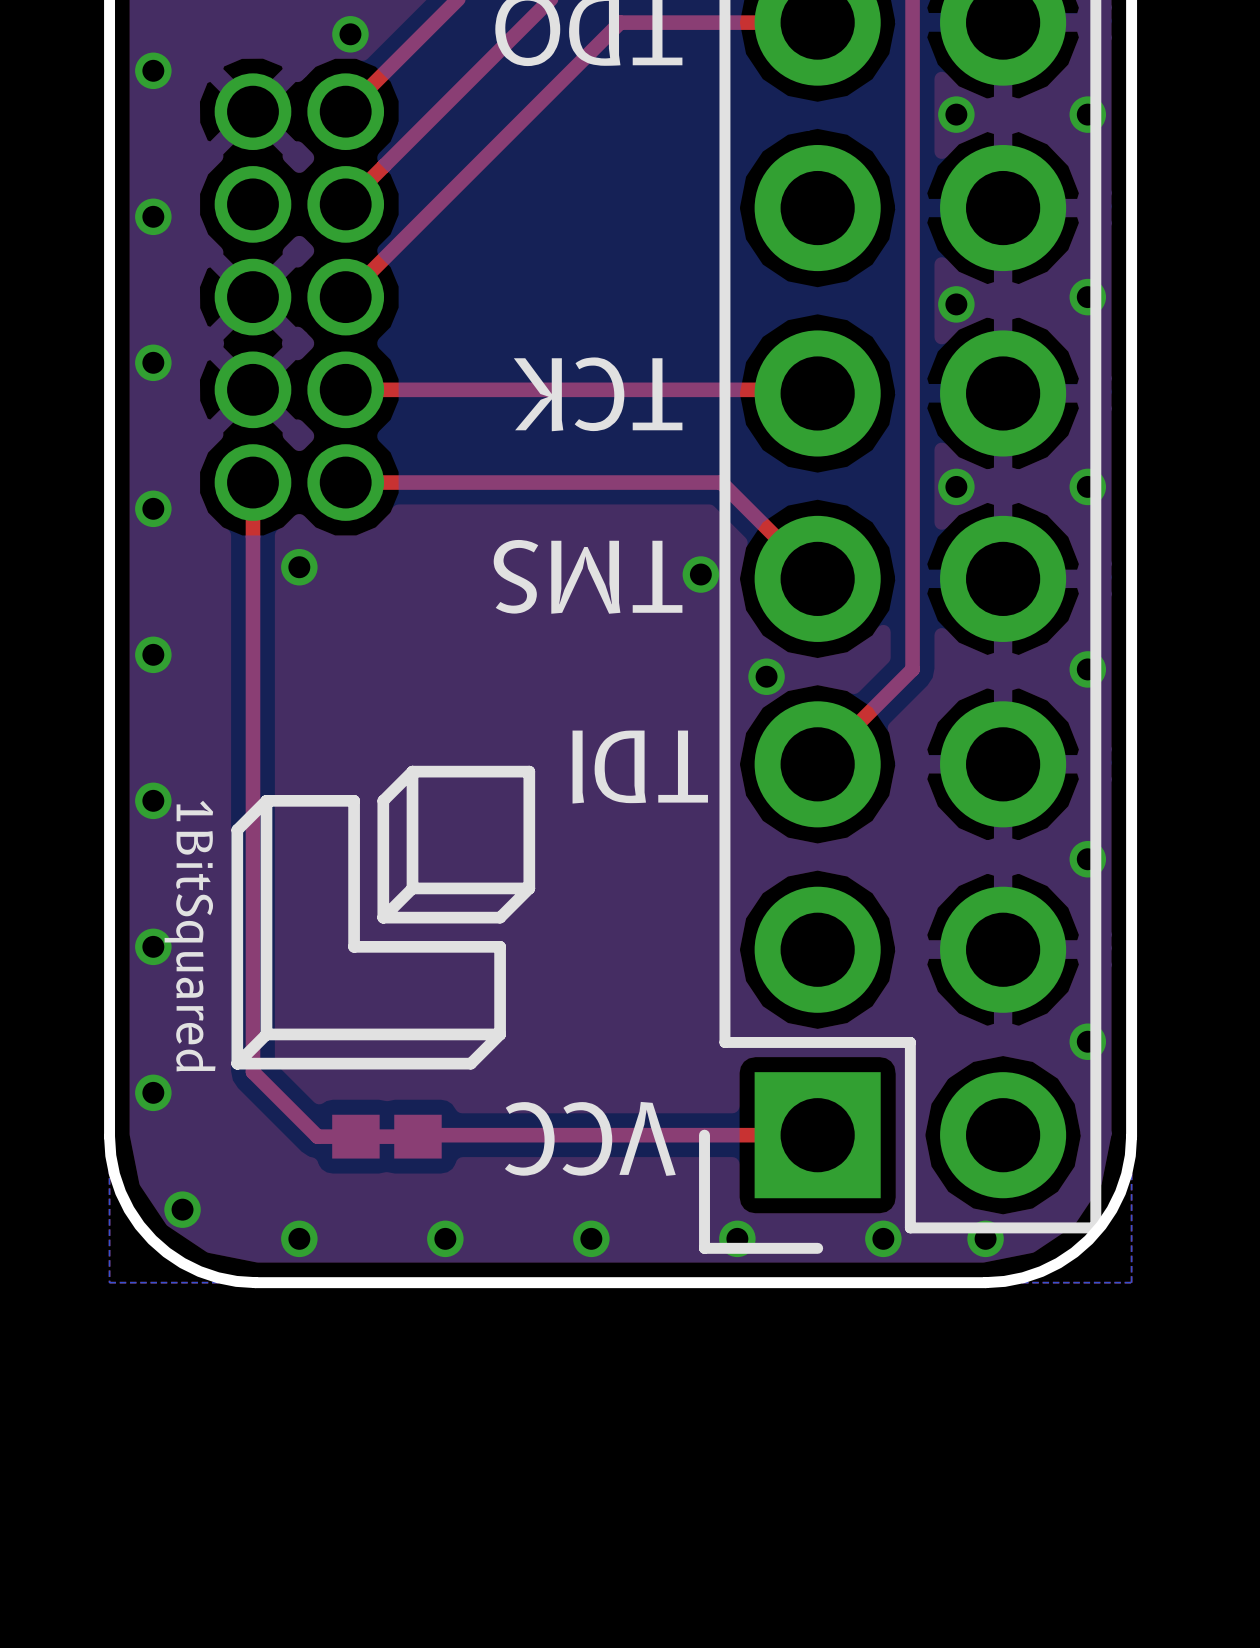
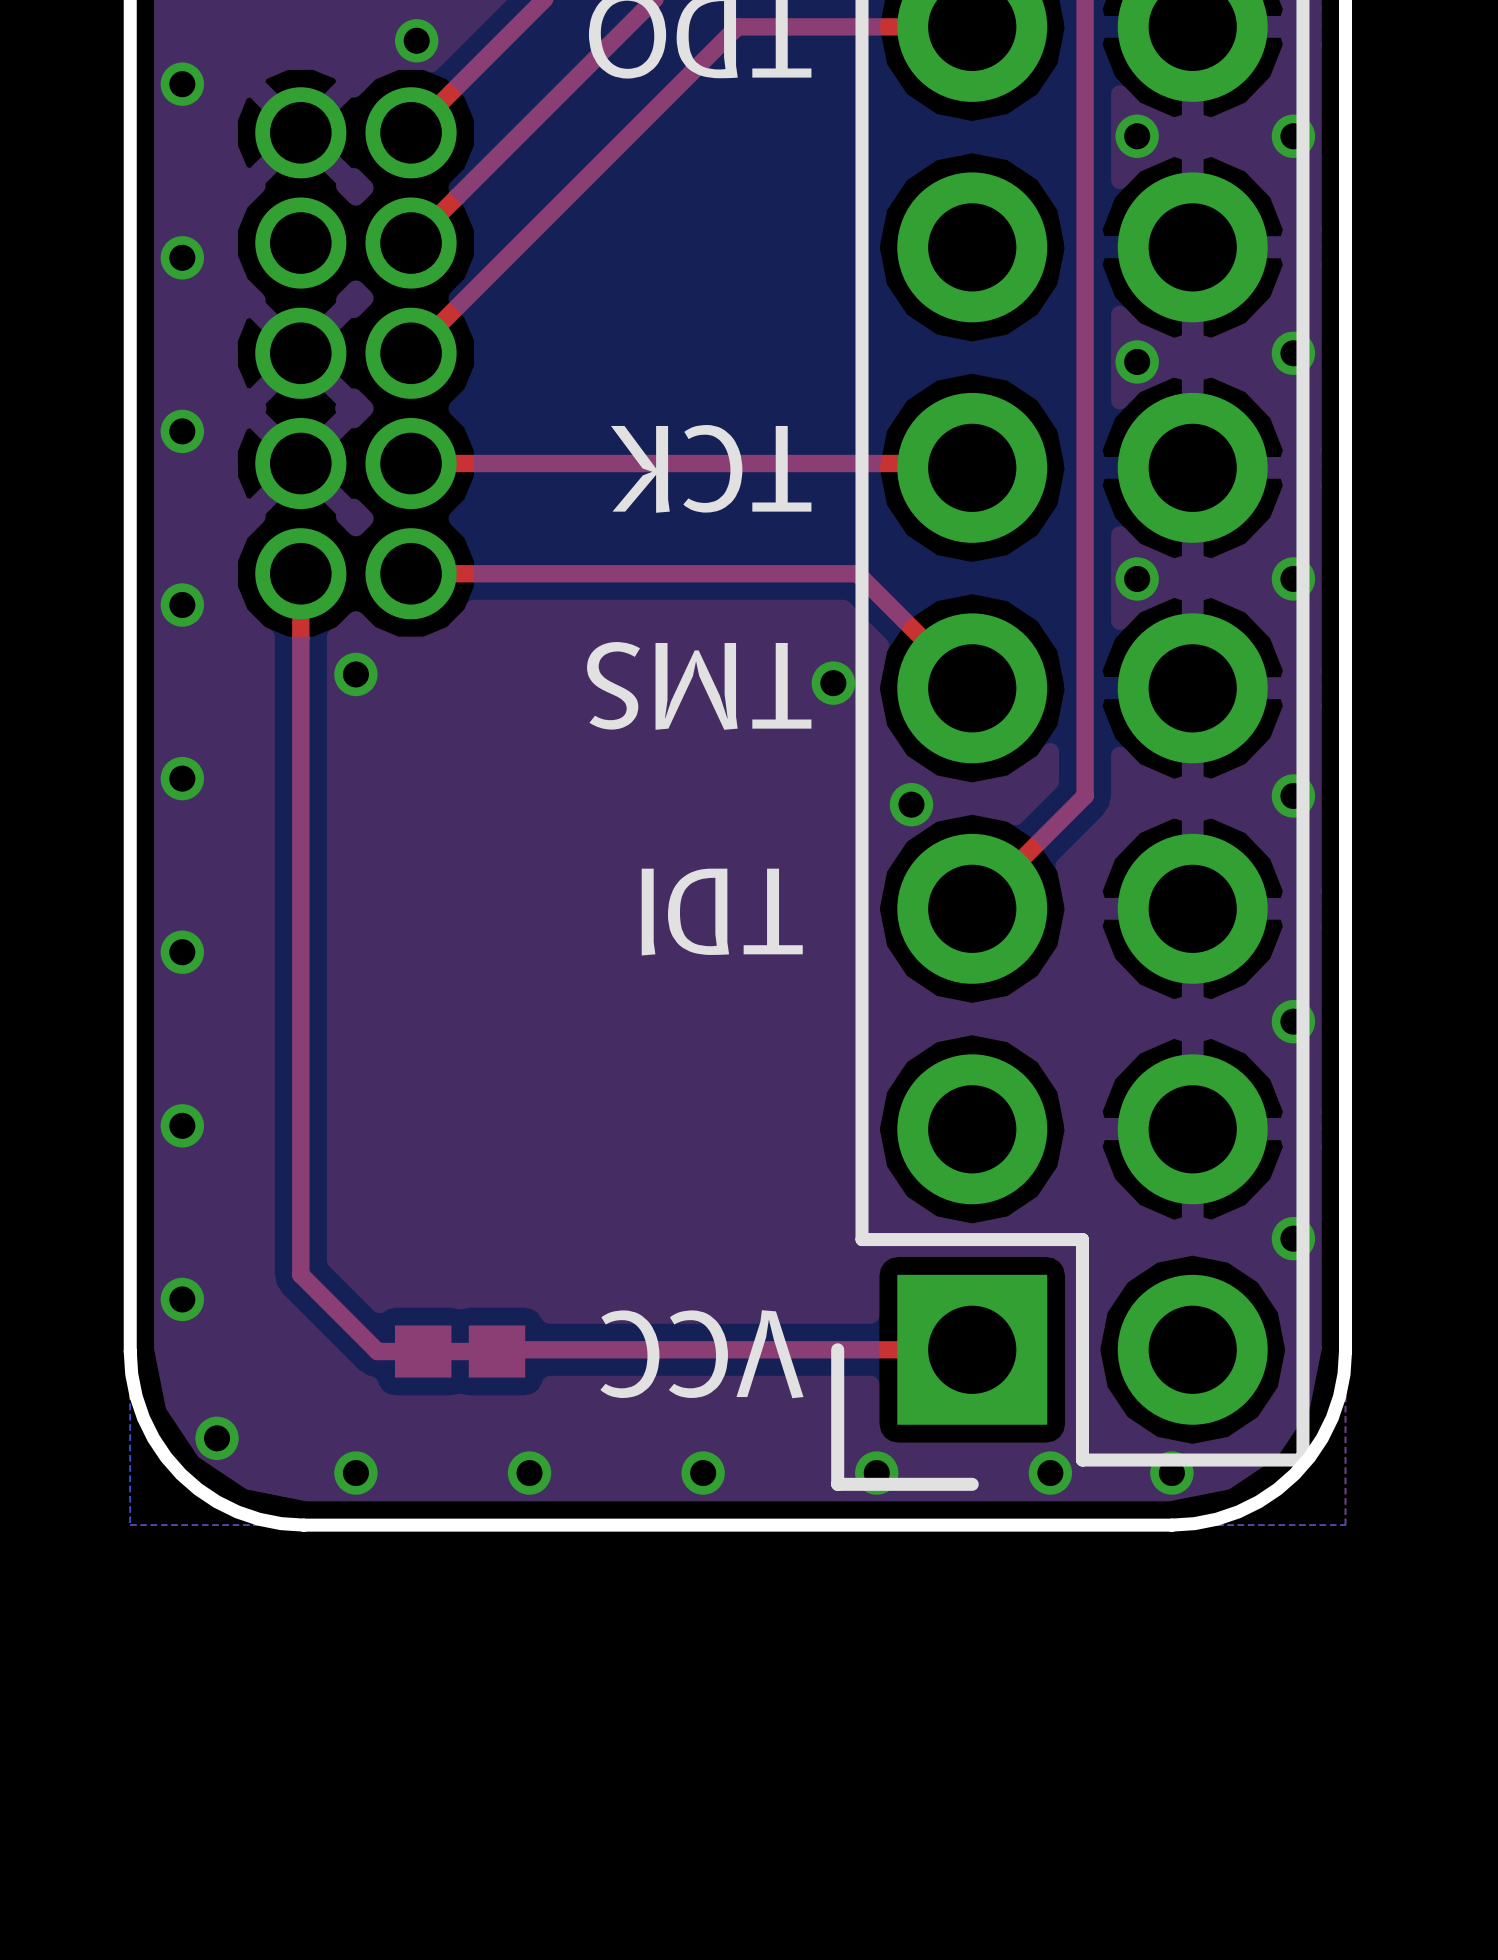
drawing: [231, 765, 536, 1070] -> none
text position: TDI (640, 767) -> TDI (722, 912)
text: 1BitSquared (190, 936) -> none

